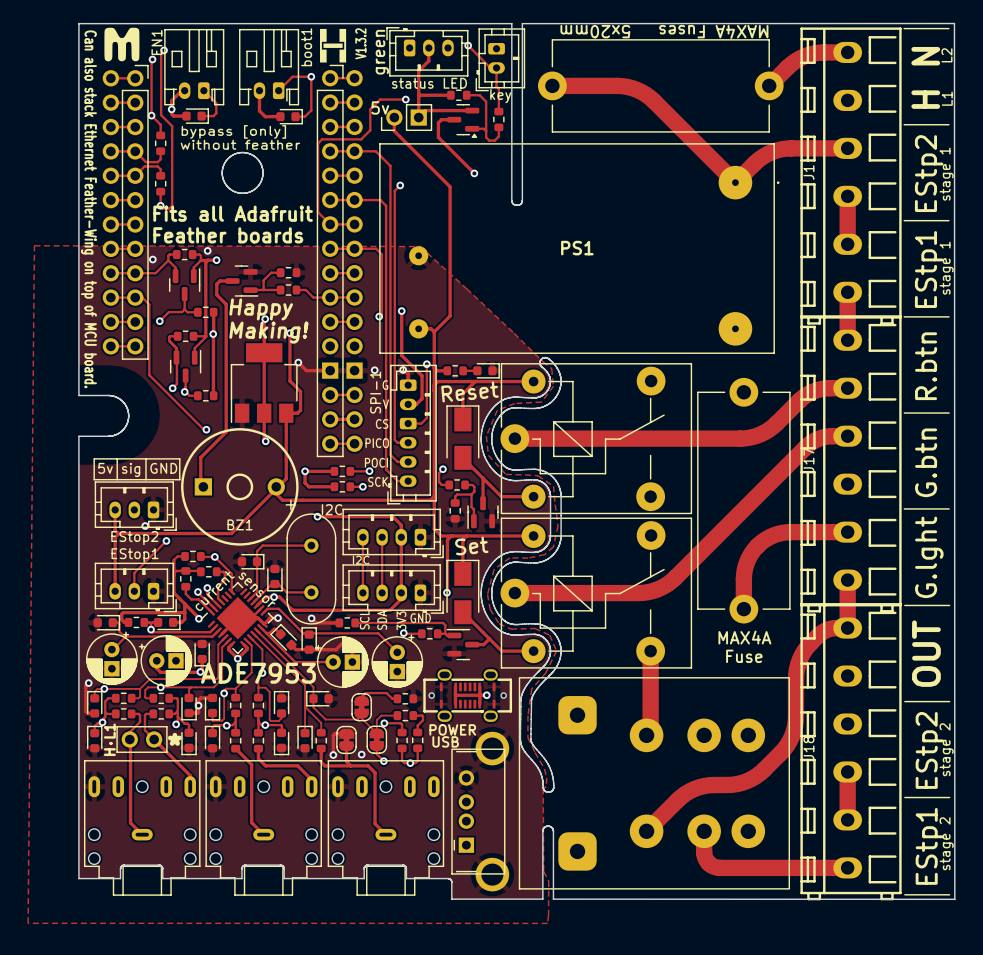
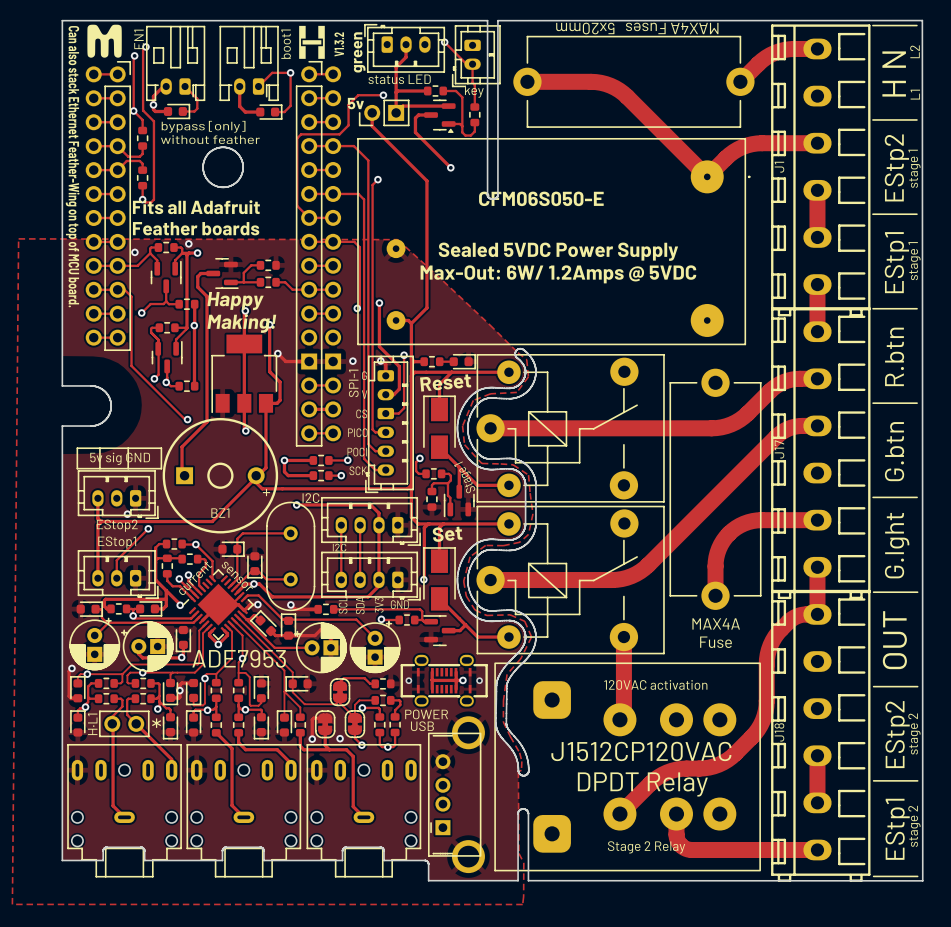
PS1 name: PS1 (577, 248) -> CFM06S050-E (541, 198)
text: none -> Sealed 5VDC Power Supply (558, 251)
text: none -> Max-Out: 6W/ 1.2Amps @ 5VDC (558, 274)
text: none -> Stage 1 (464, 477)
text: none -> 120VAC activation (655, 684)
text: none -> J1512CP120VAC (641, 751)
text: none -> DPDT Relay (642, 784)
text: none -> Stage 2 Relay (646, 847)

